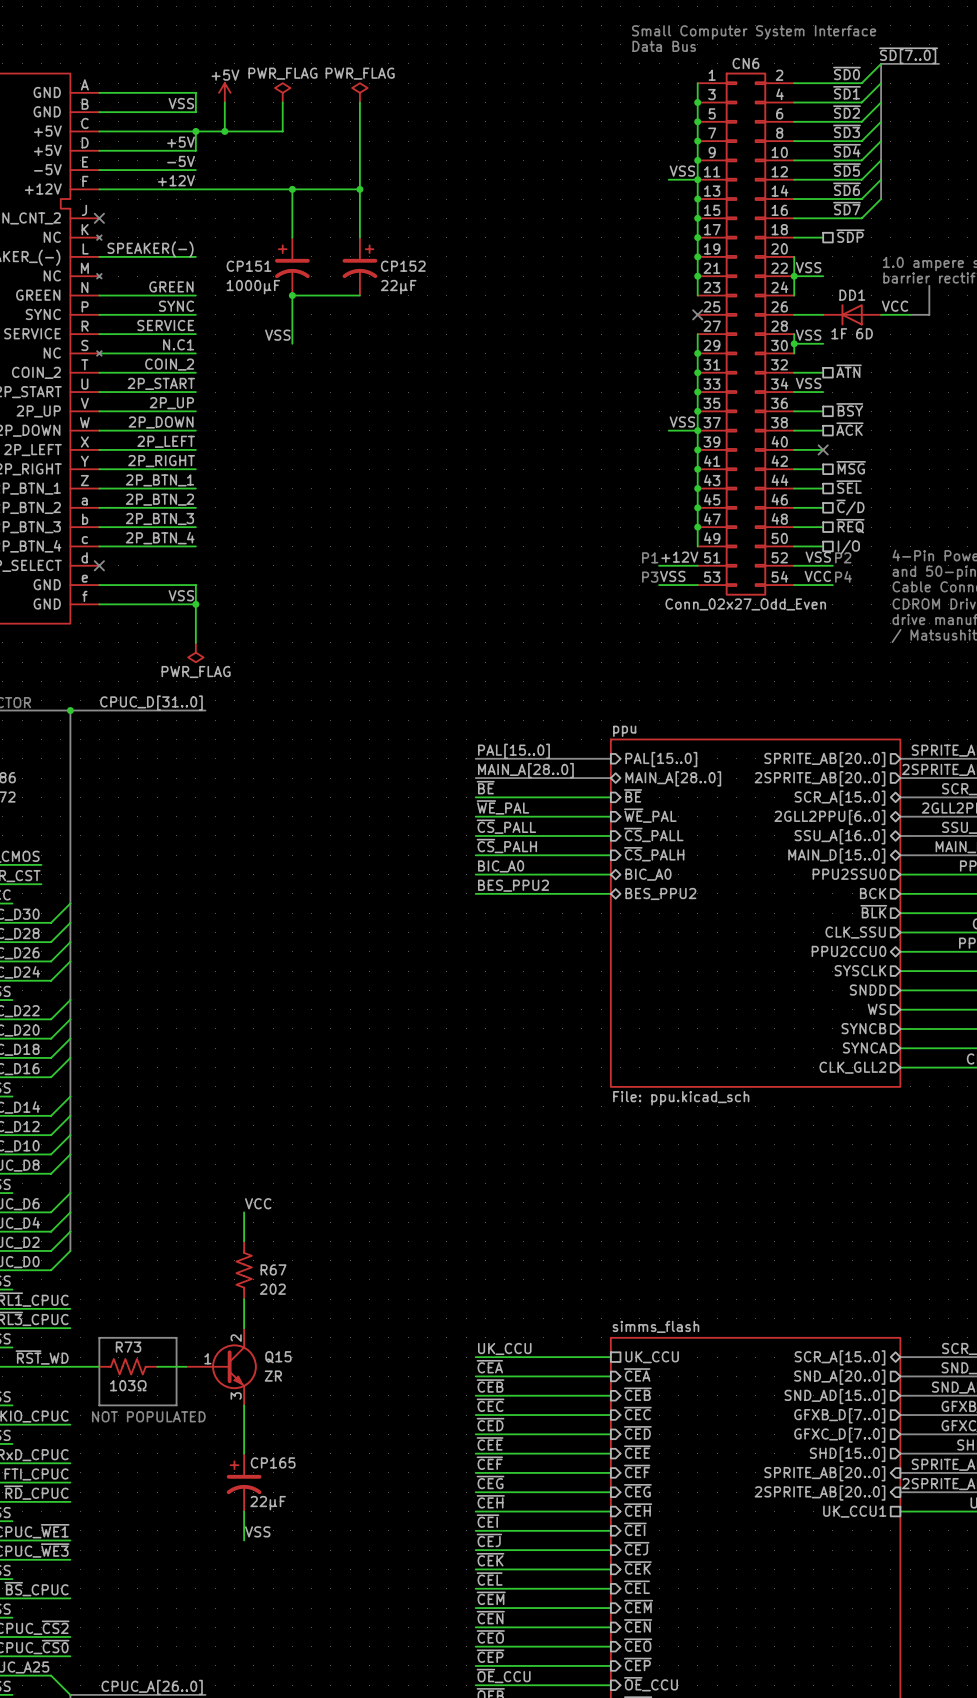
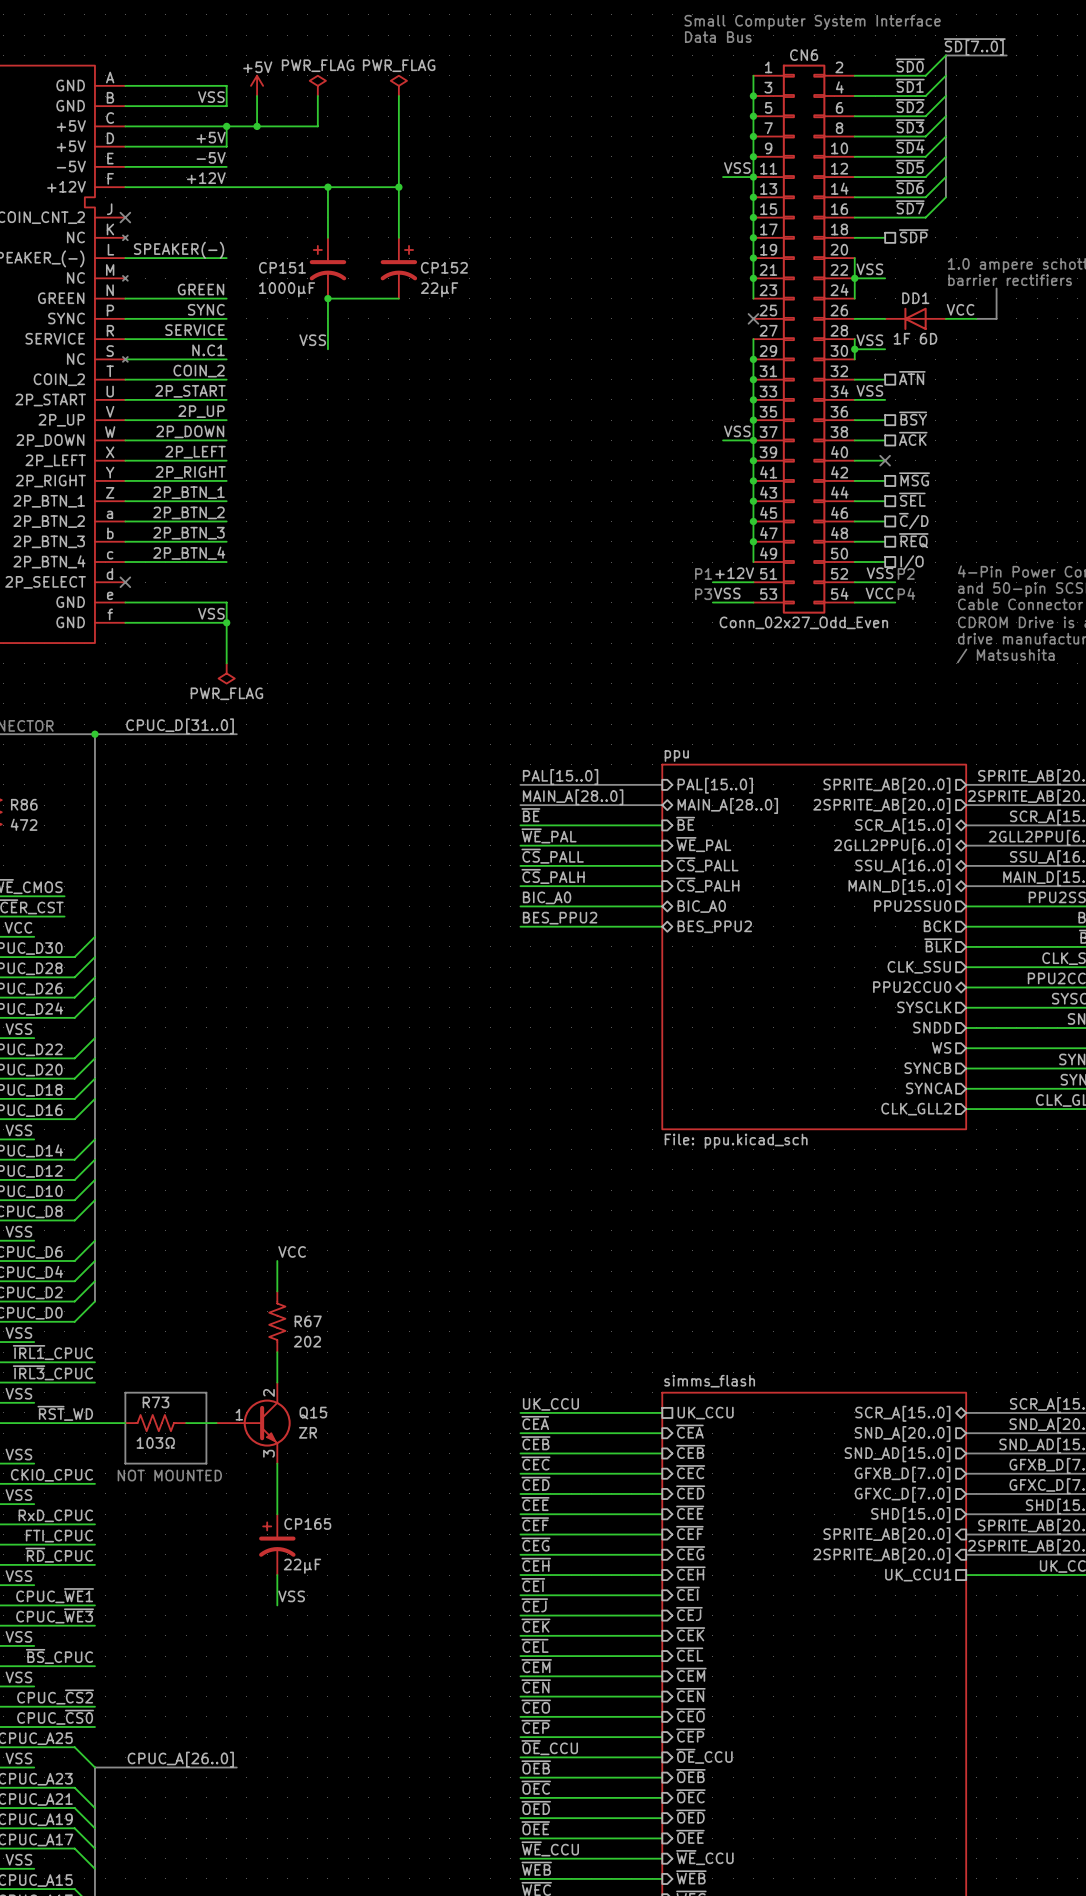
text: NOT POPULATED (148, 1416) -> NOT MOUNTED (169, 1475)

